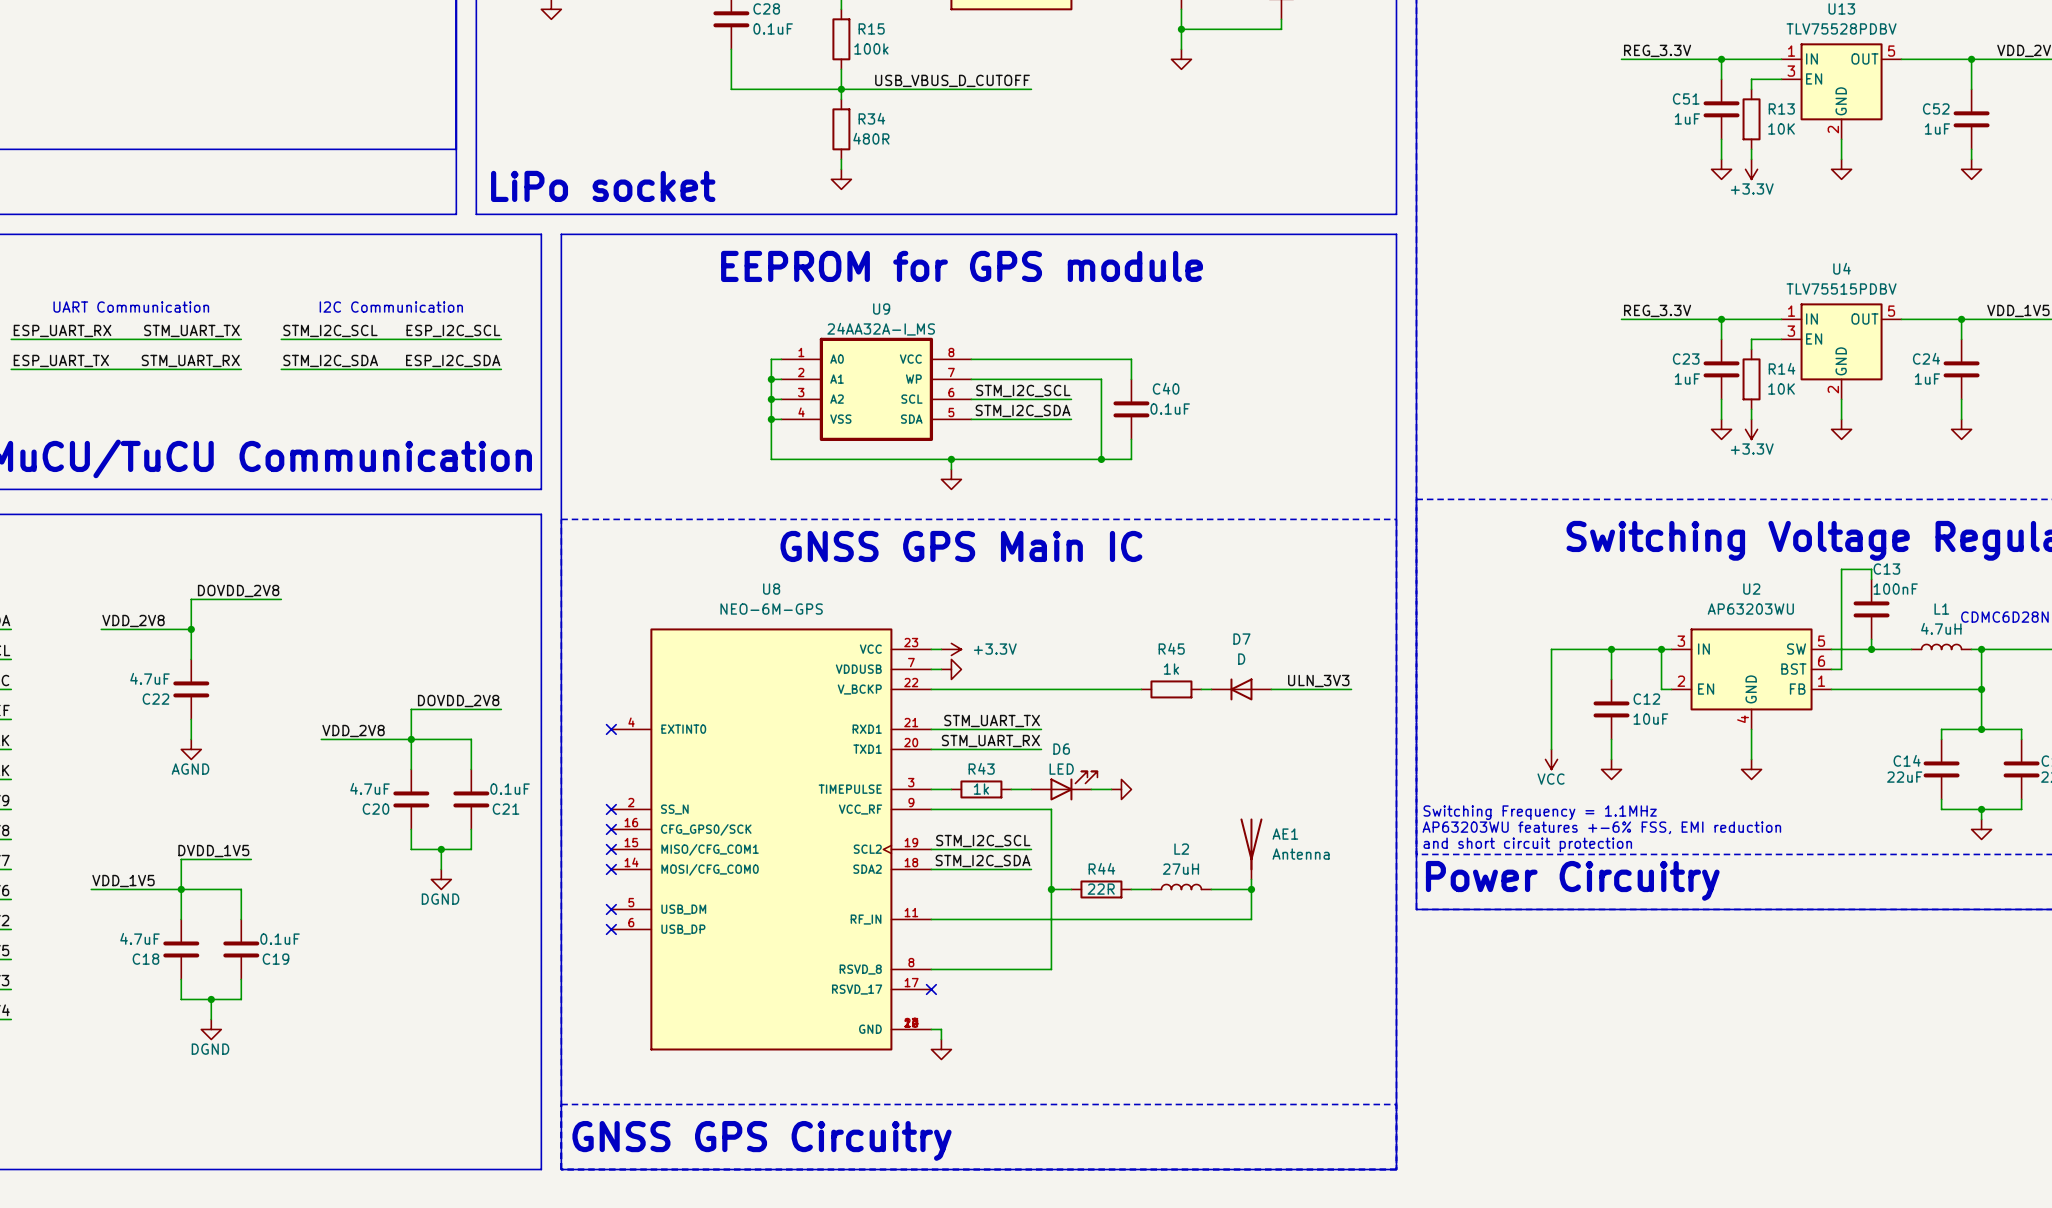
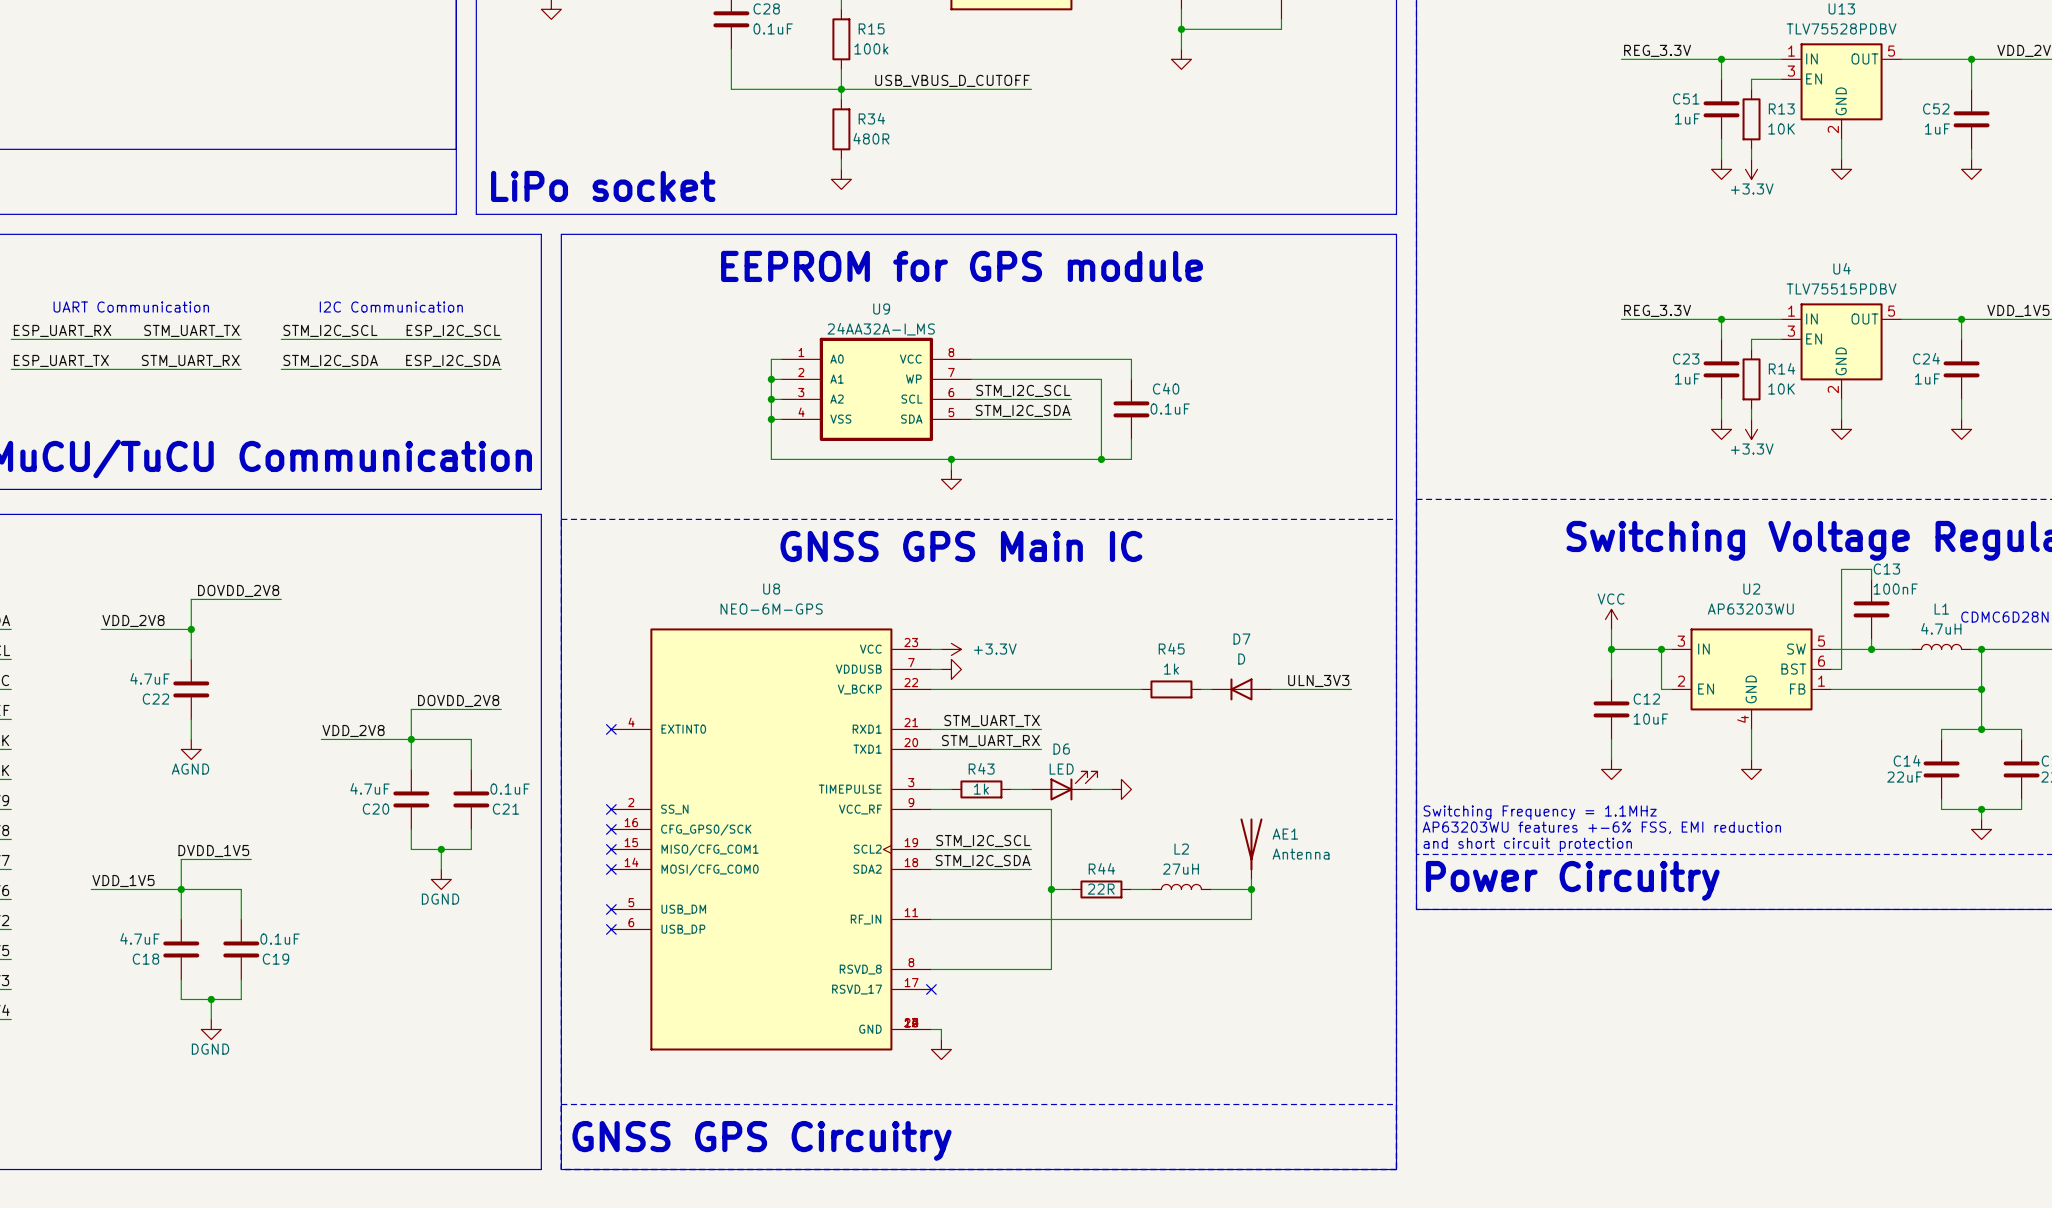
wire: (1611, 649) (1551, 649) (1551, 749) -> (1611, 649) (1611, 629)
power symbol rotation: 0° (1551, 759) -> 180° (1611, 619)
power symbol position: VCC (1551, 759) -> VCC (1611, 619)

